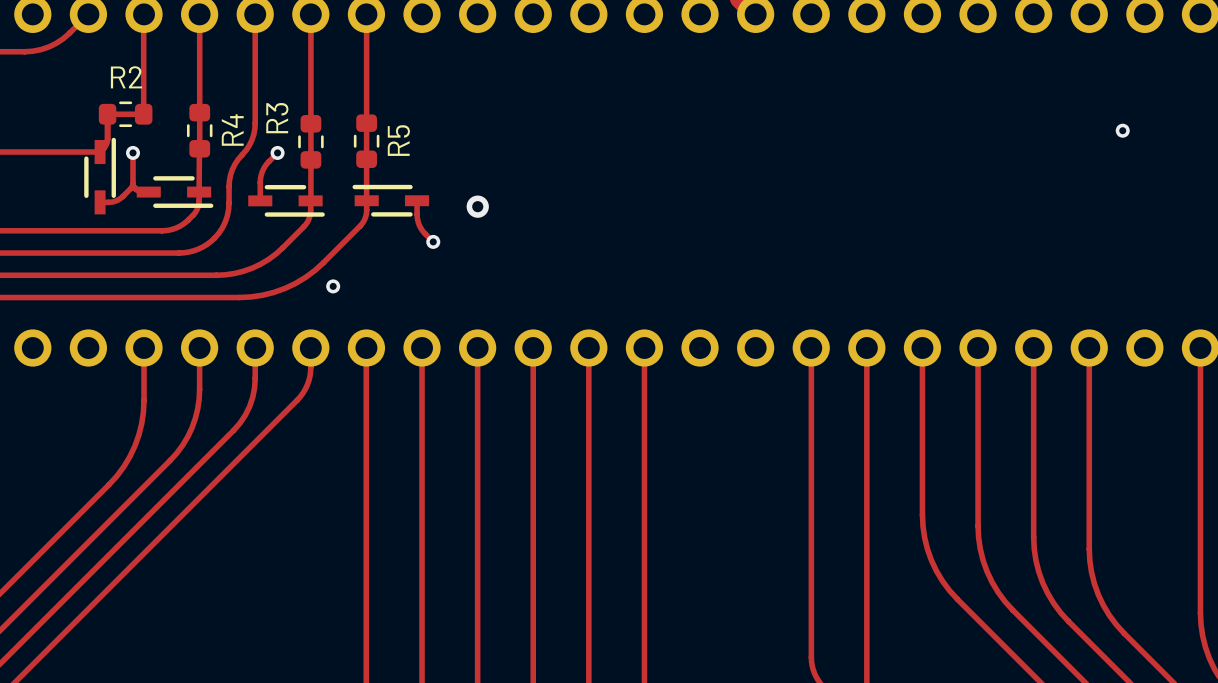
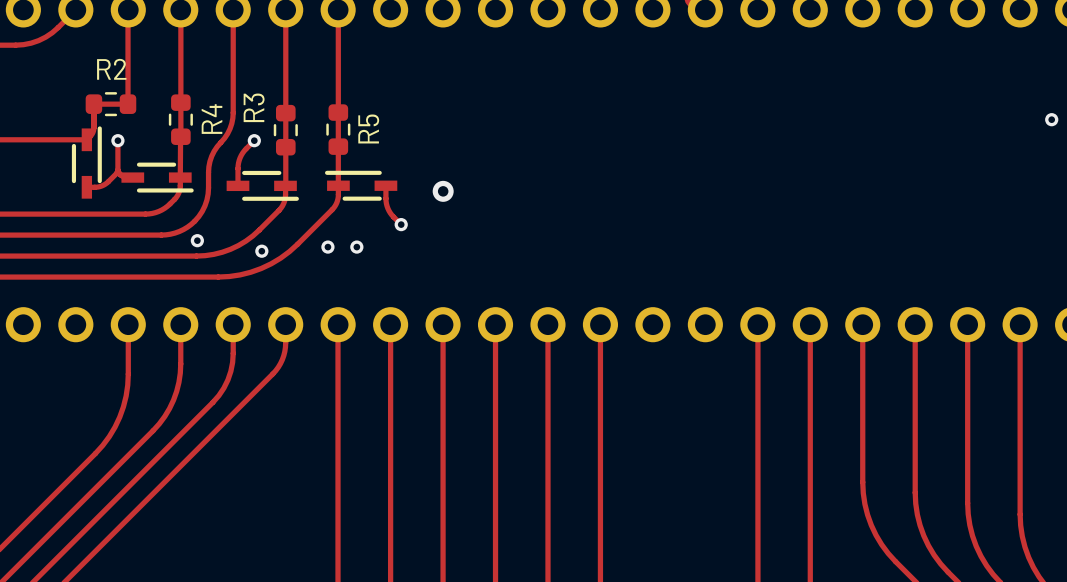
via: none -> (197, 240)
via: none -> (327, 247)
via: none -> (356, 247)
via: none -> (261, 251)
via: (333, 286) -> none

